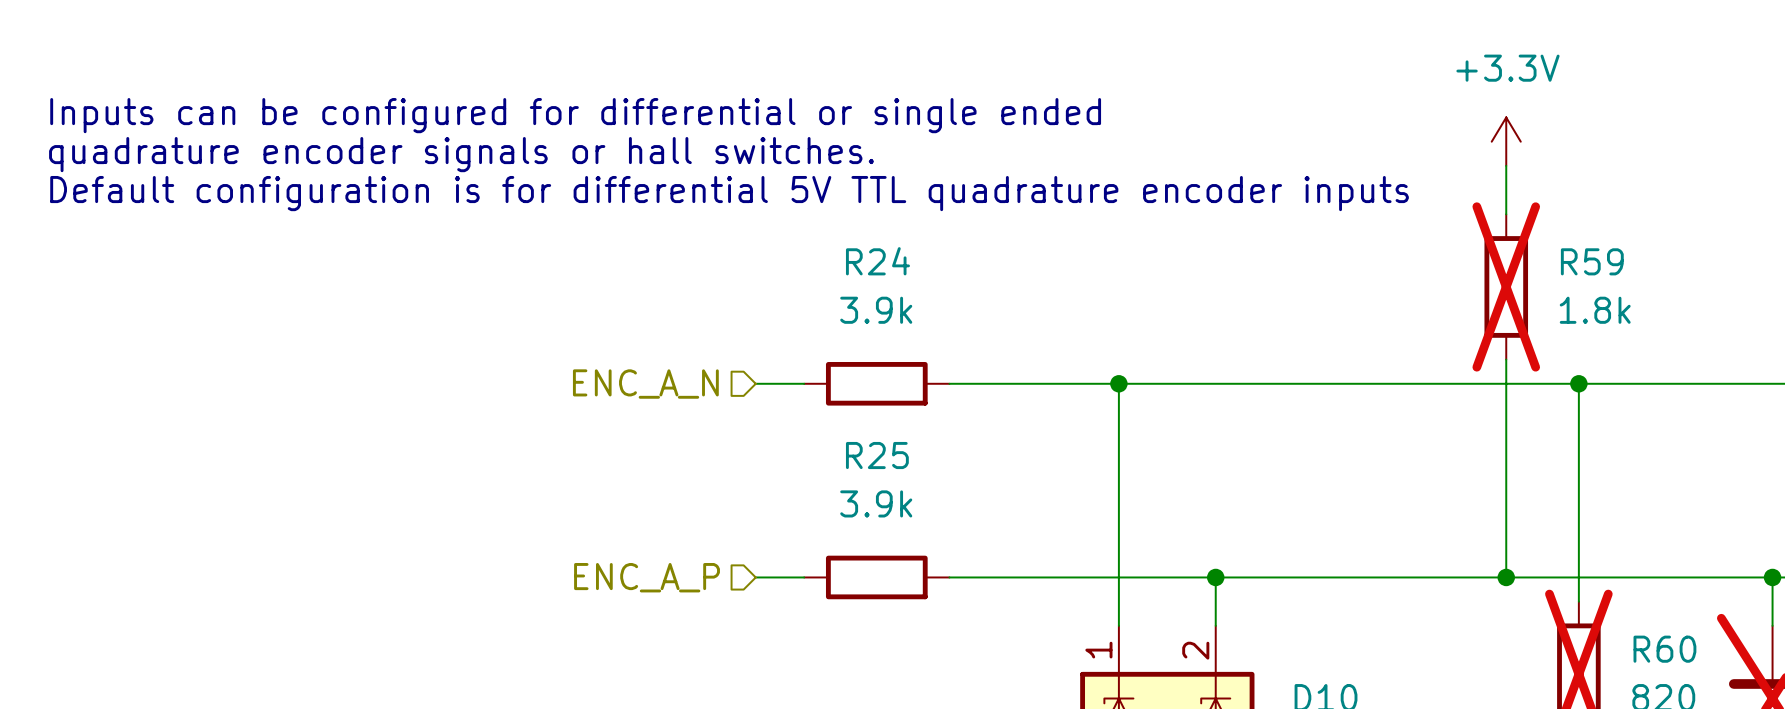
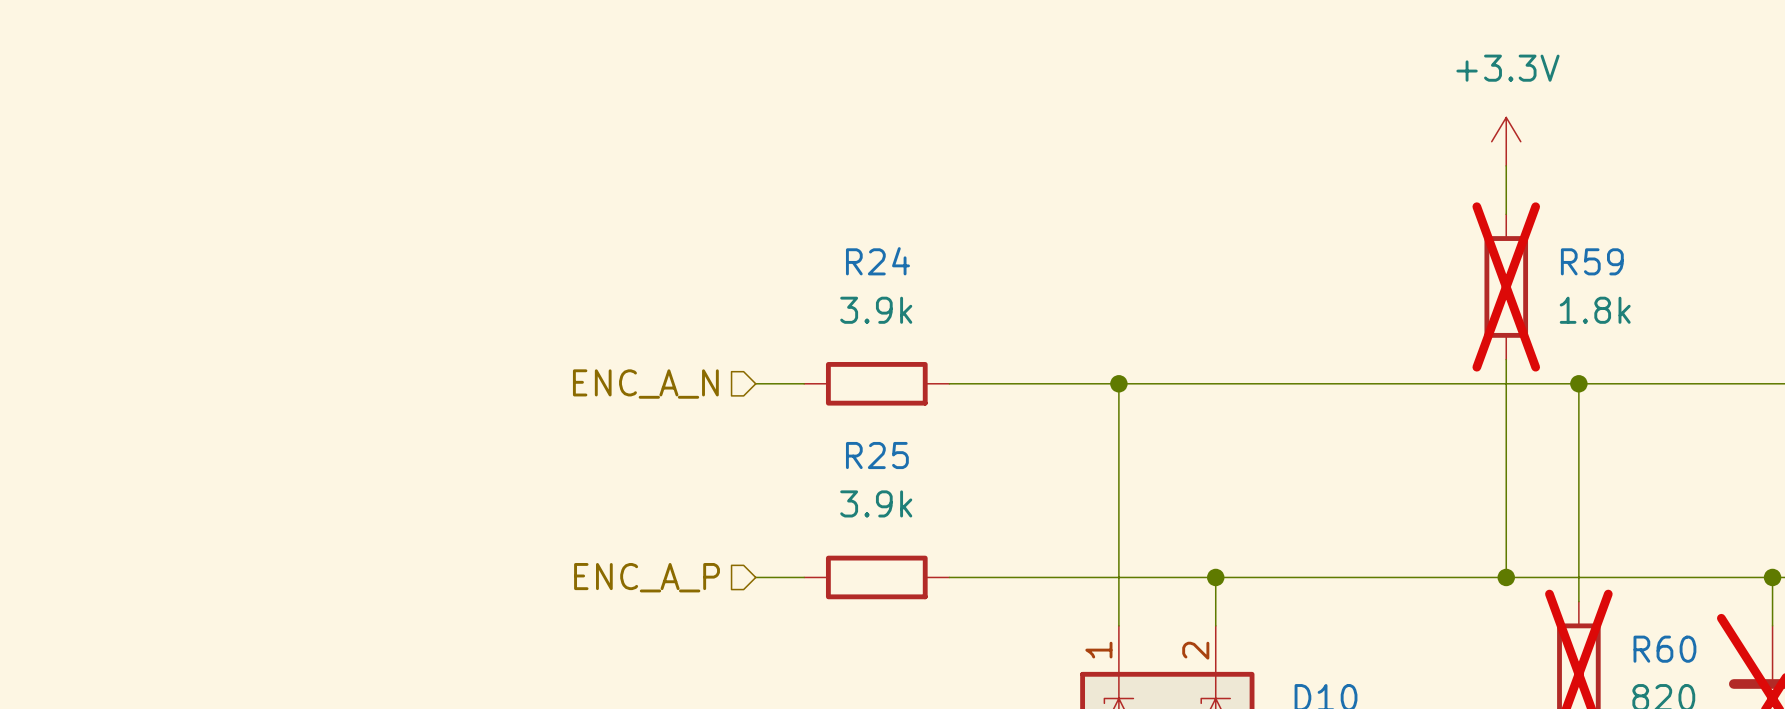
text: Inputs can be configured for differential or single ended (575, 115) -> none
text: quadrature encoder signals or hall switches. (461, 154) -> none
text: Default configuration is for differential 5V TTL quadrature encoder inputs (729, 193) -> none

